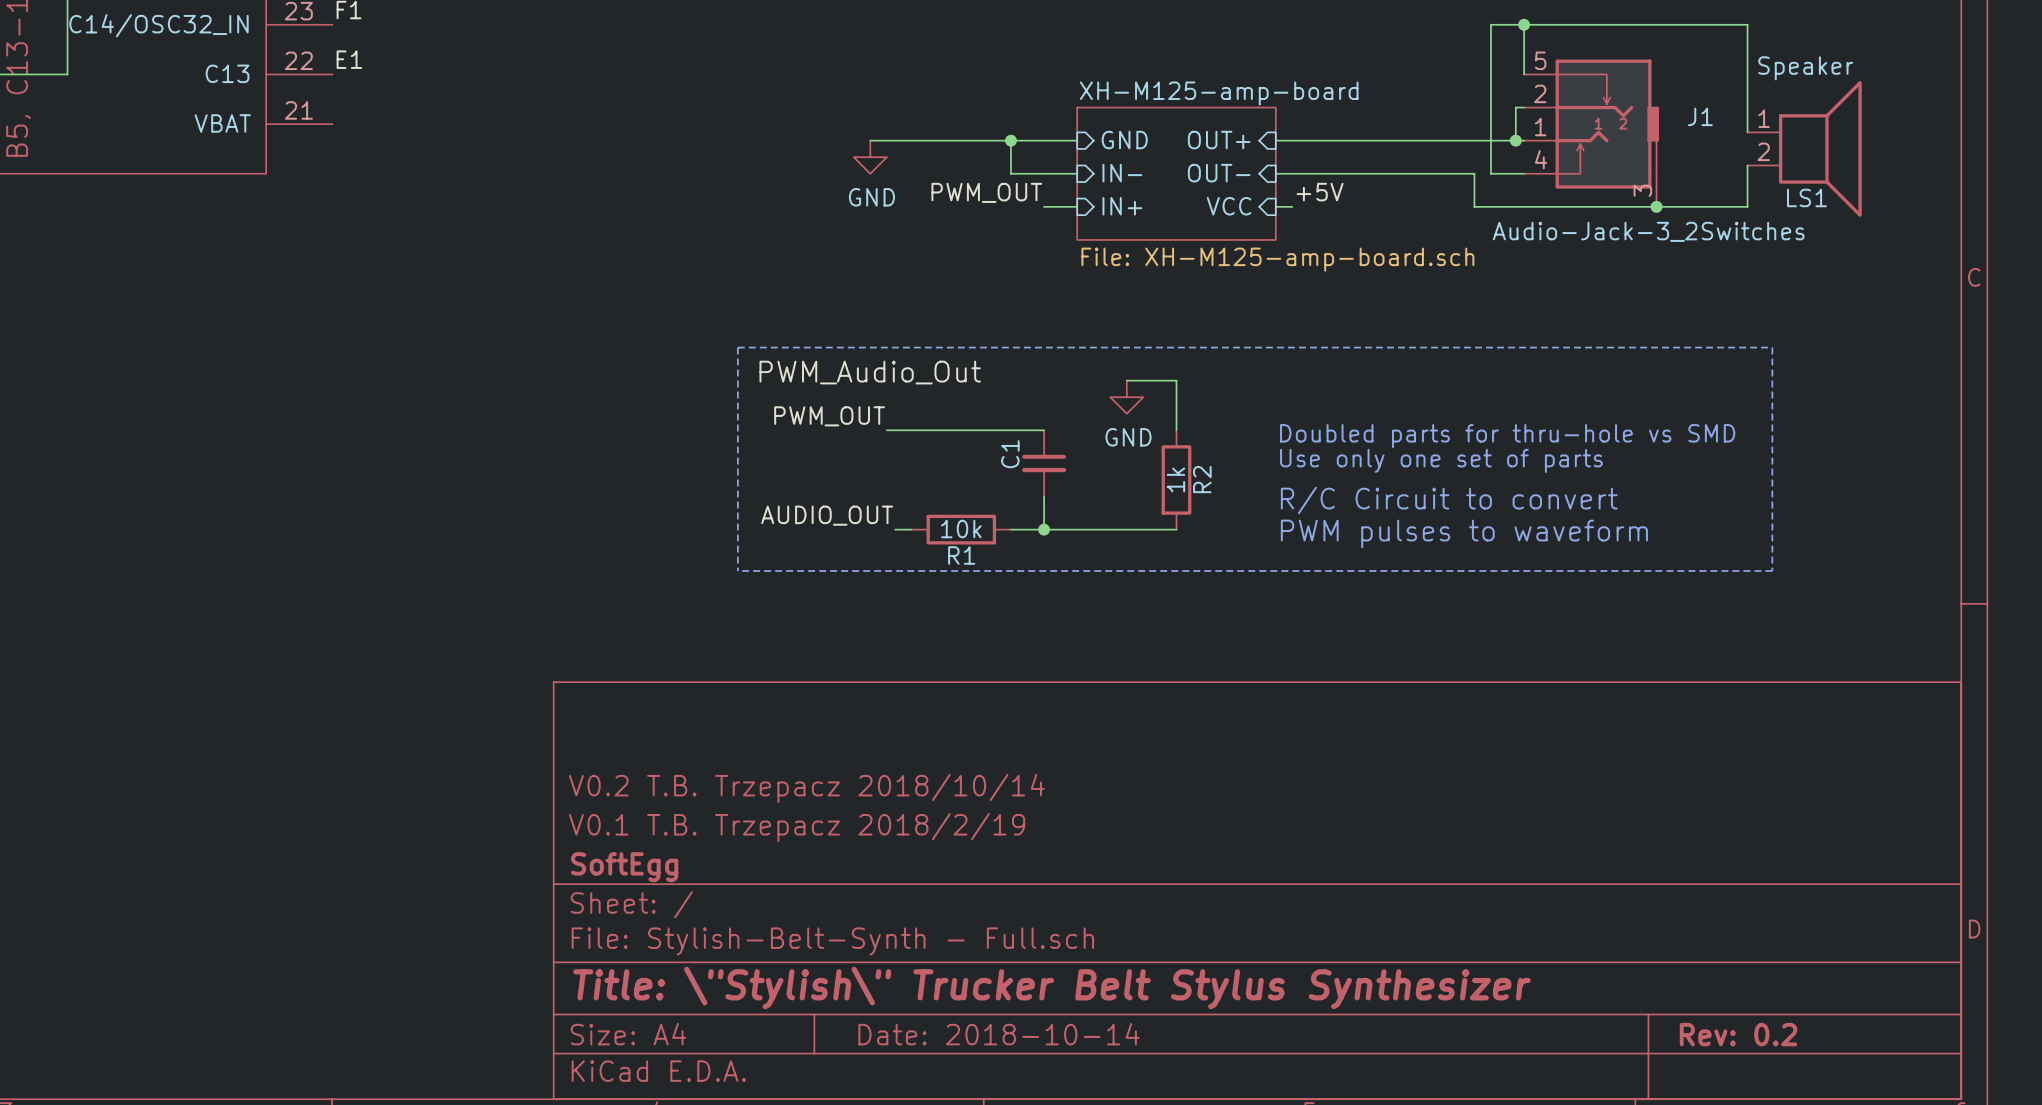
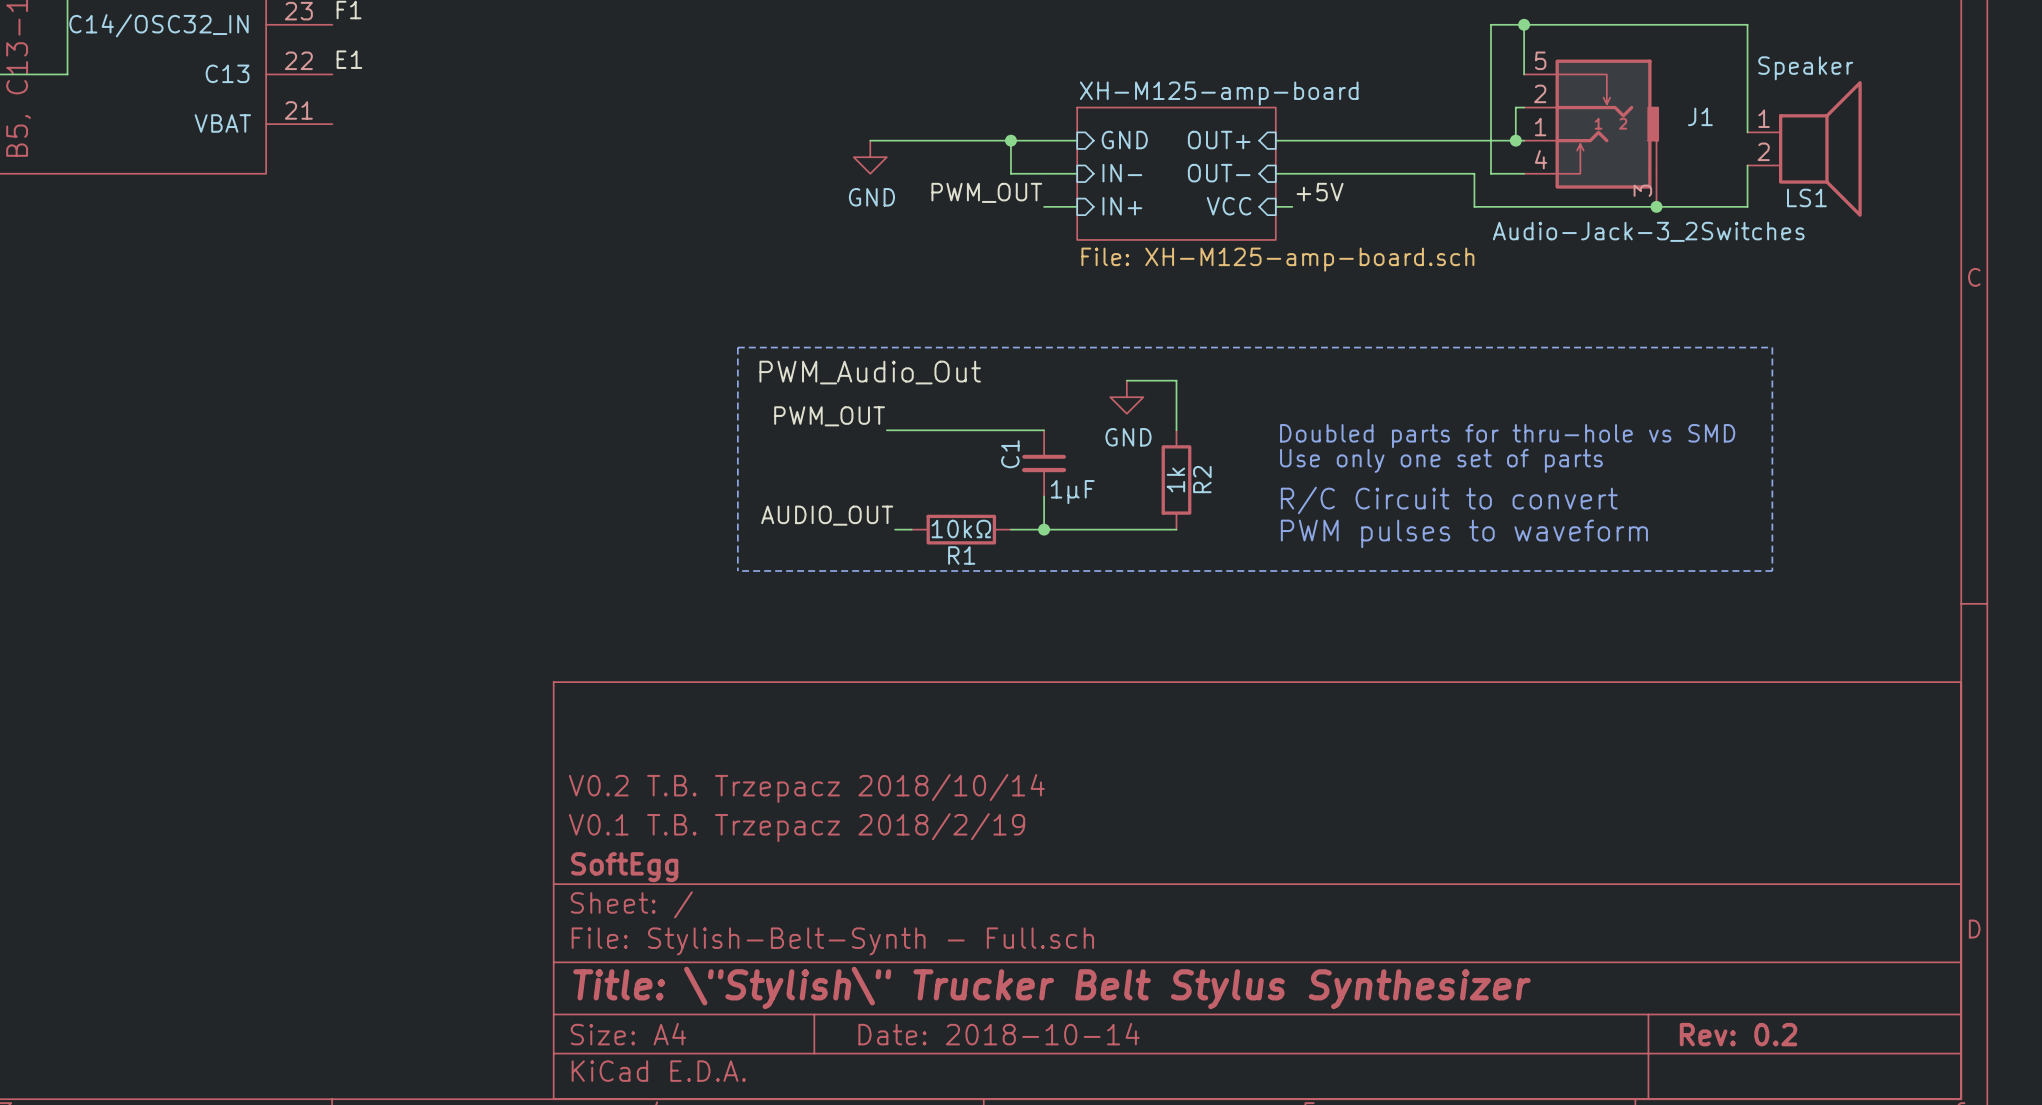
C1 value: none -> 1μF (1072, 492)
R1 value: 10k (961, 529) -> 10kΩ (961, 529)

